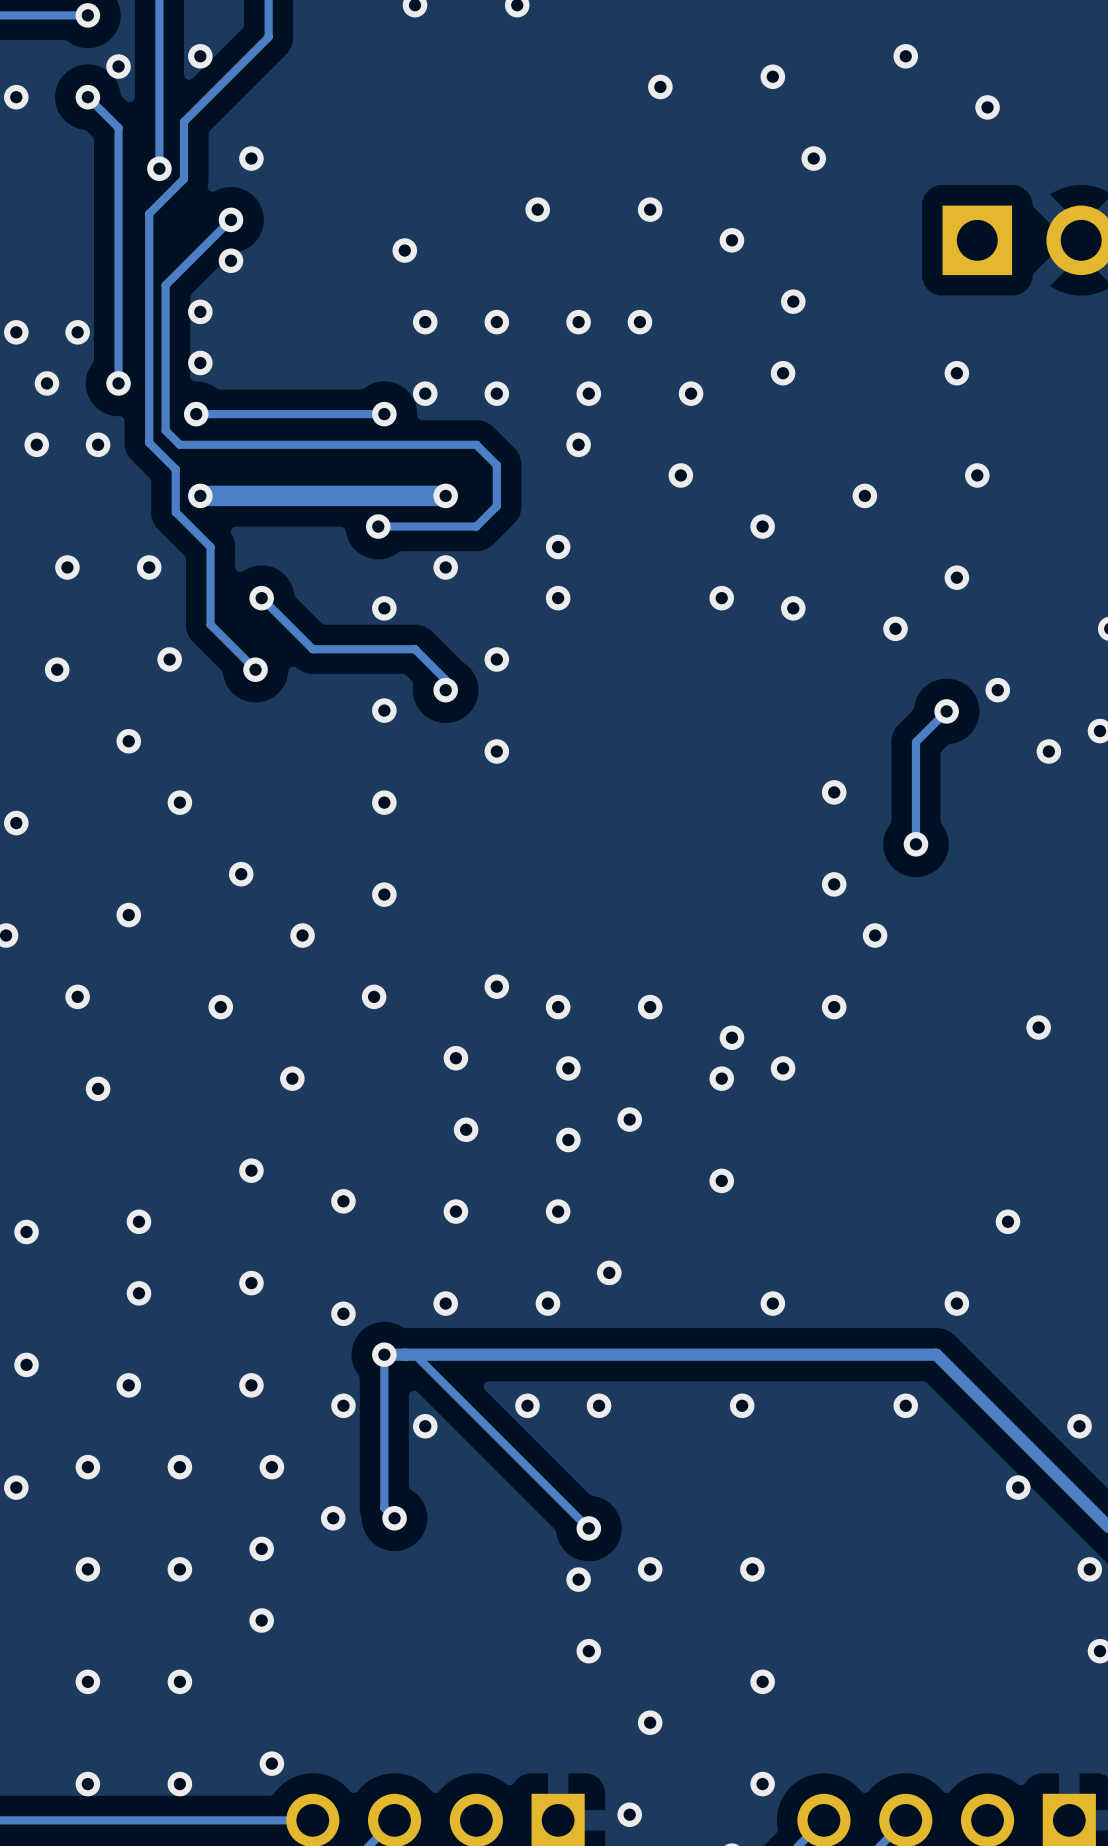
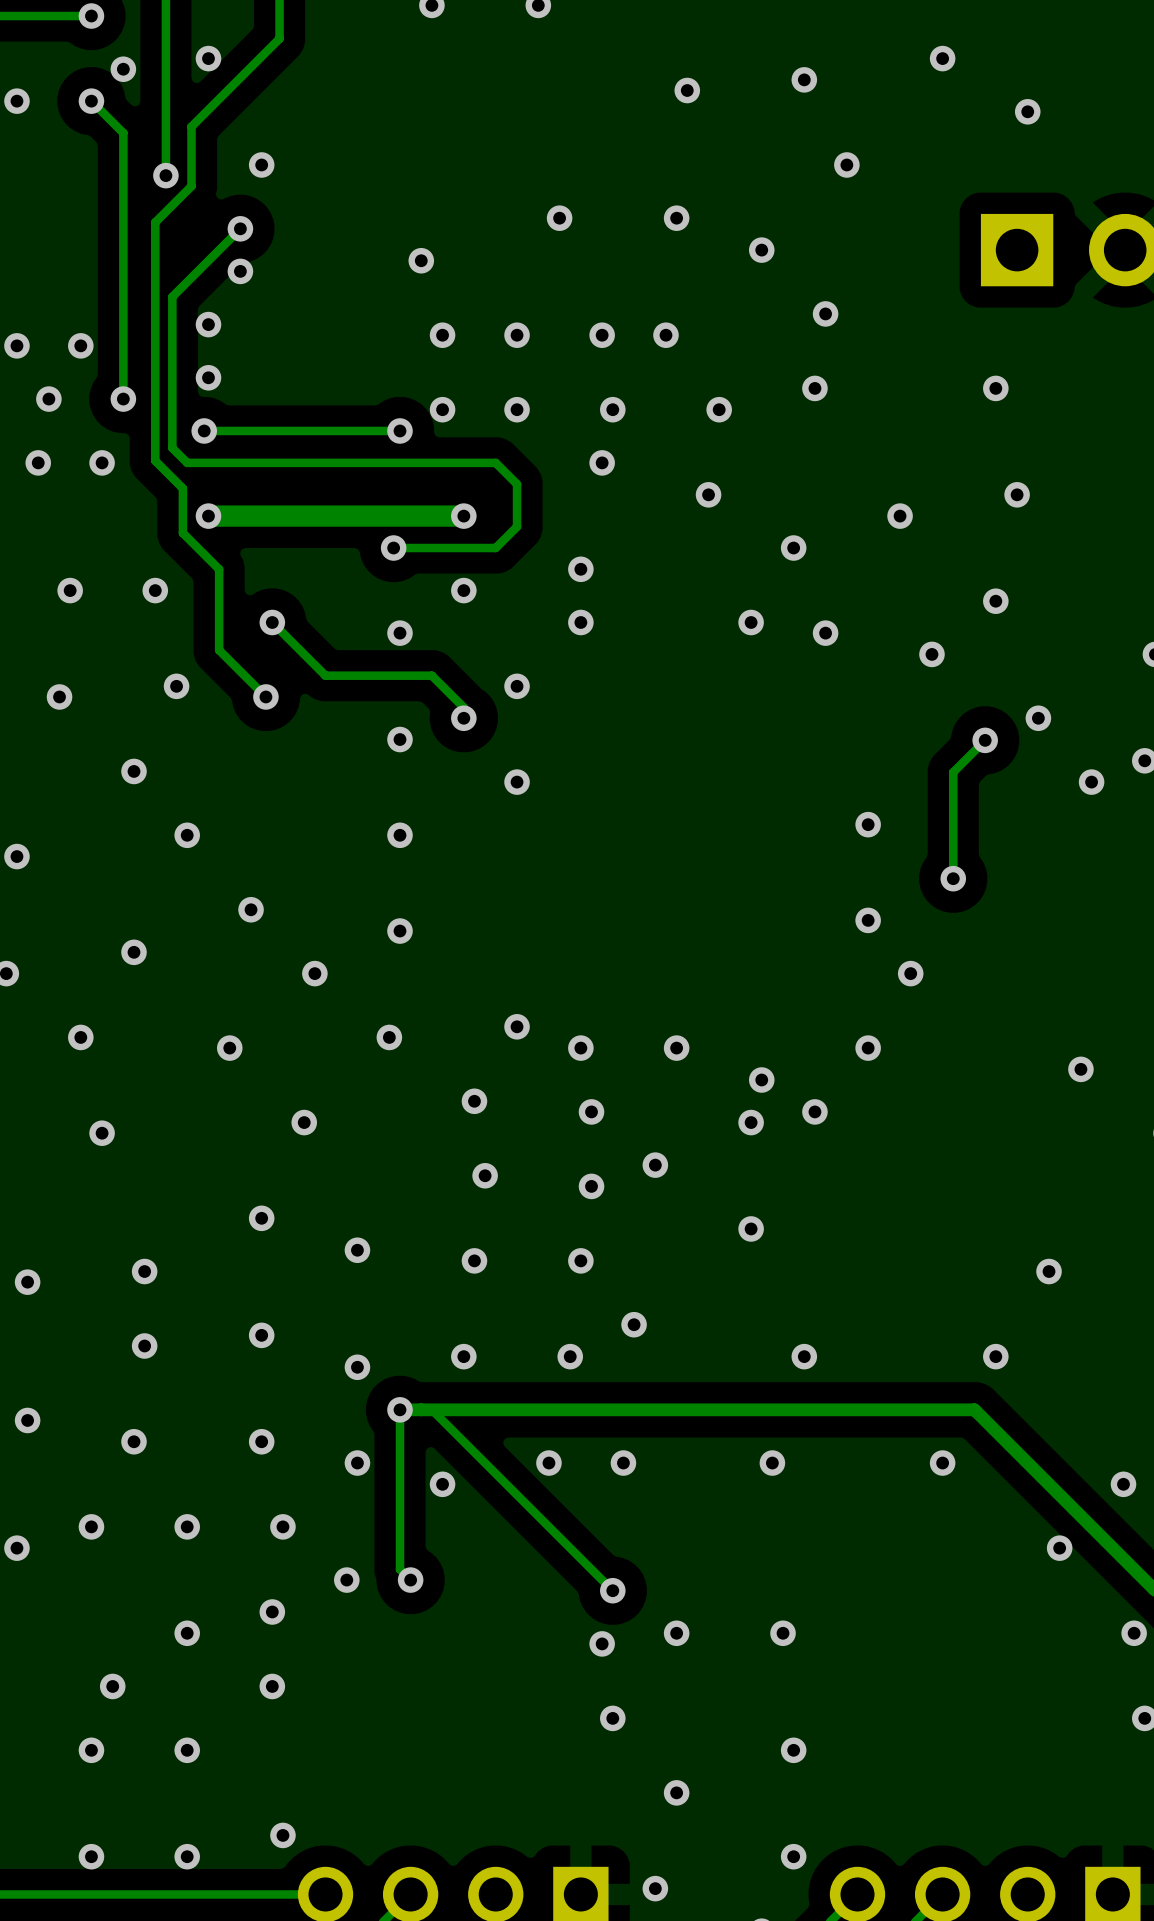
via position: (87, 1569) -> (112, 1686)

